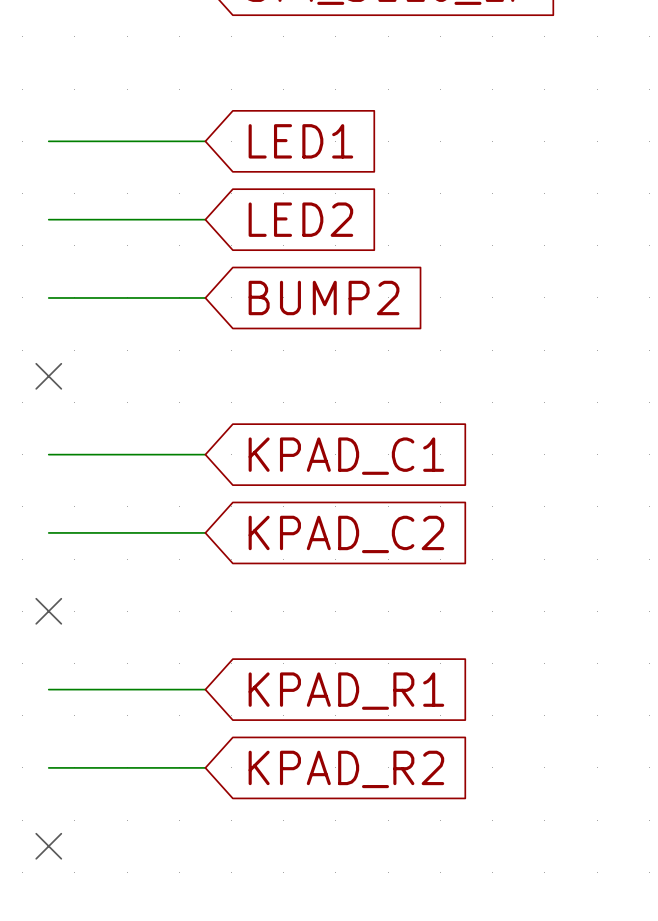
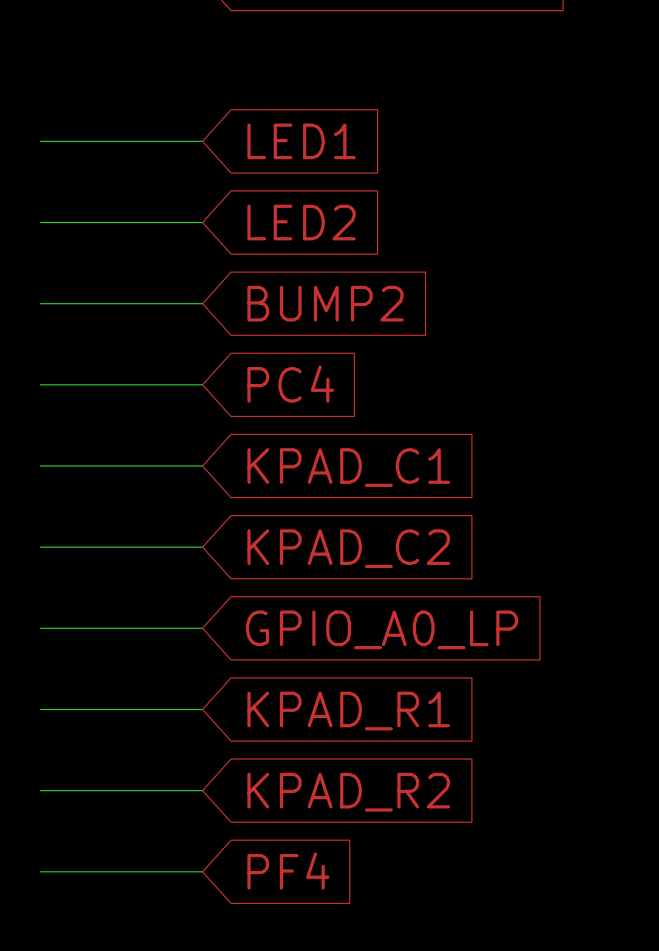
global label: none -> PC4 (290, 384)
wire: none -> (40, 384) (202, 384)
no-connect mark: (48, 376) -> none
wire: none -> (40, 628) (202, 628)
no-connect mark: (48, 611) -> none
global label: none -> GPIO_A0_LP (381, 629)
global label: none -> PF4 (288, 871)
wire: none -> (40, 871) (202, 871)
no-connect mark: (48, 846) -> none

